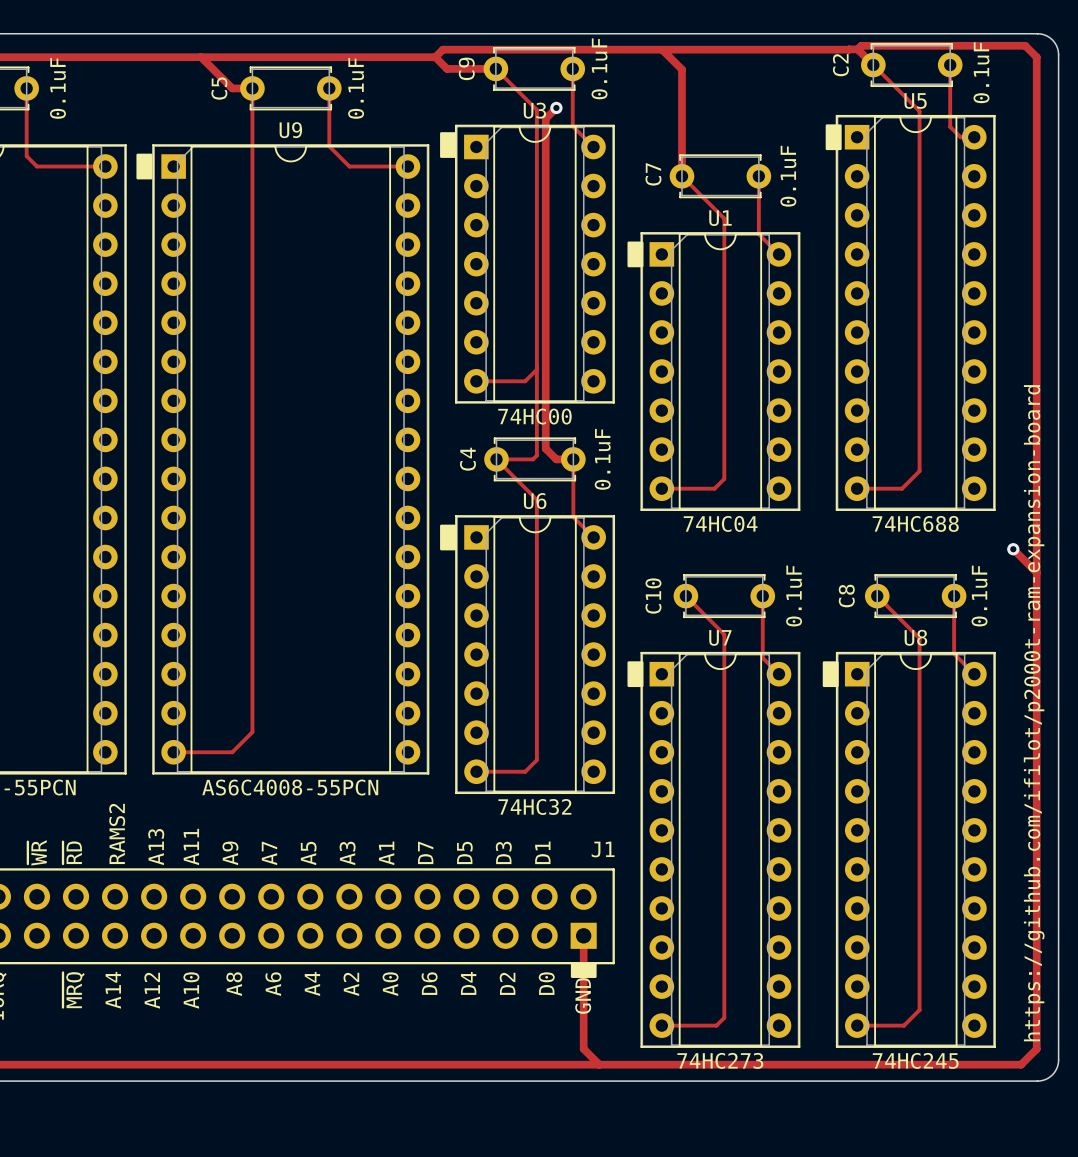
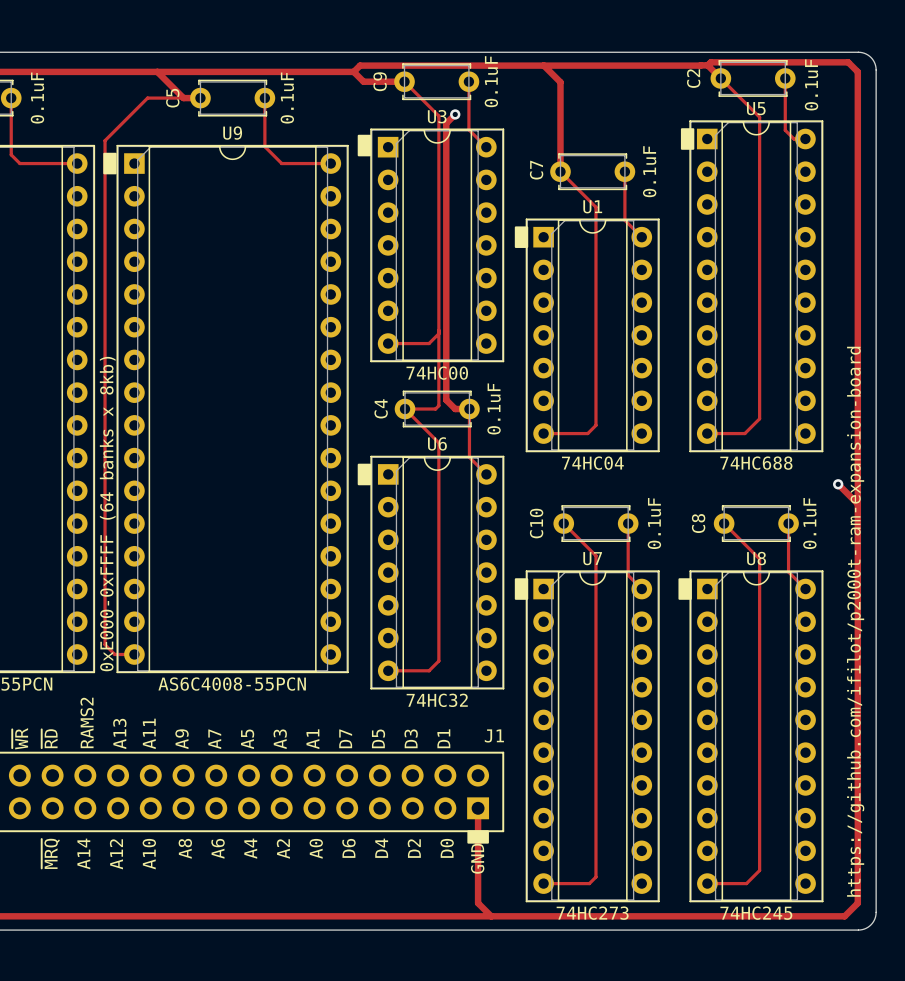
track: (252, 88) (252, 732) (232, 752) (173, 752) -> (200, 98) (147, 98) (105, 140) (105, 644) (114, 654) (134, 654)
text: none -> 0xE000-0xFFFF (64 banks x 8kb) (107, 514)

